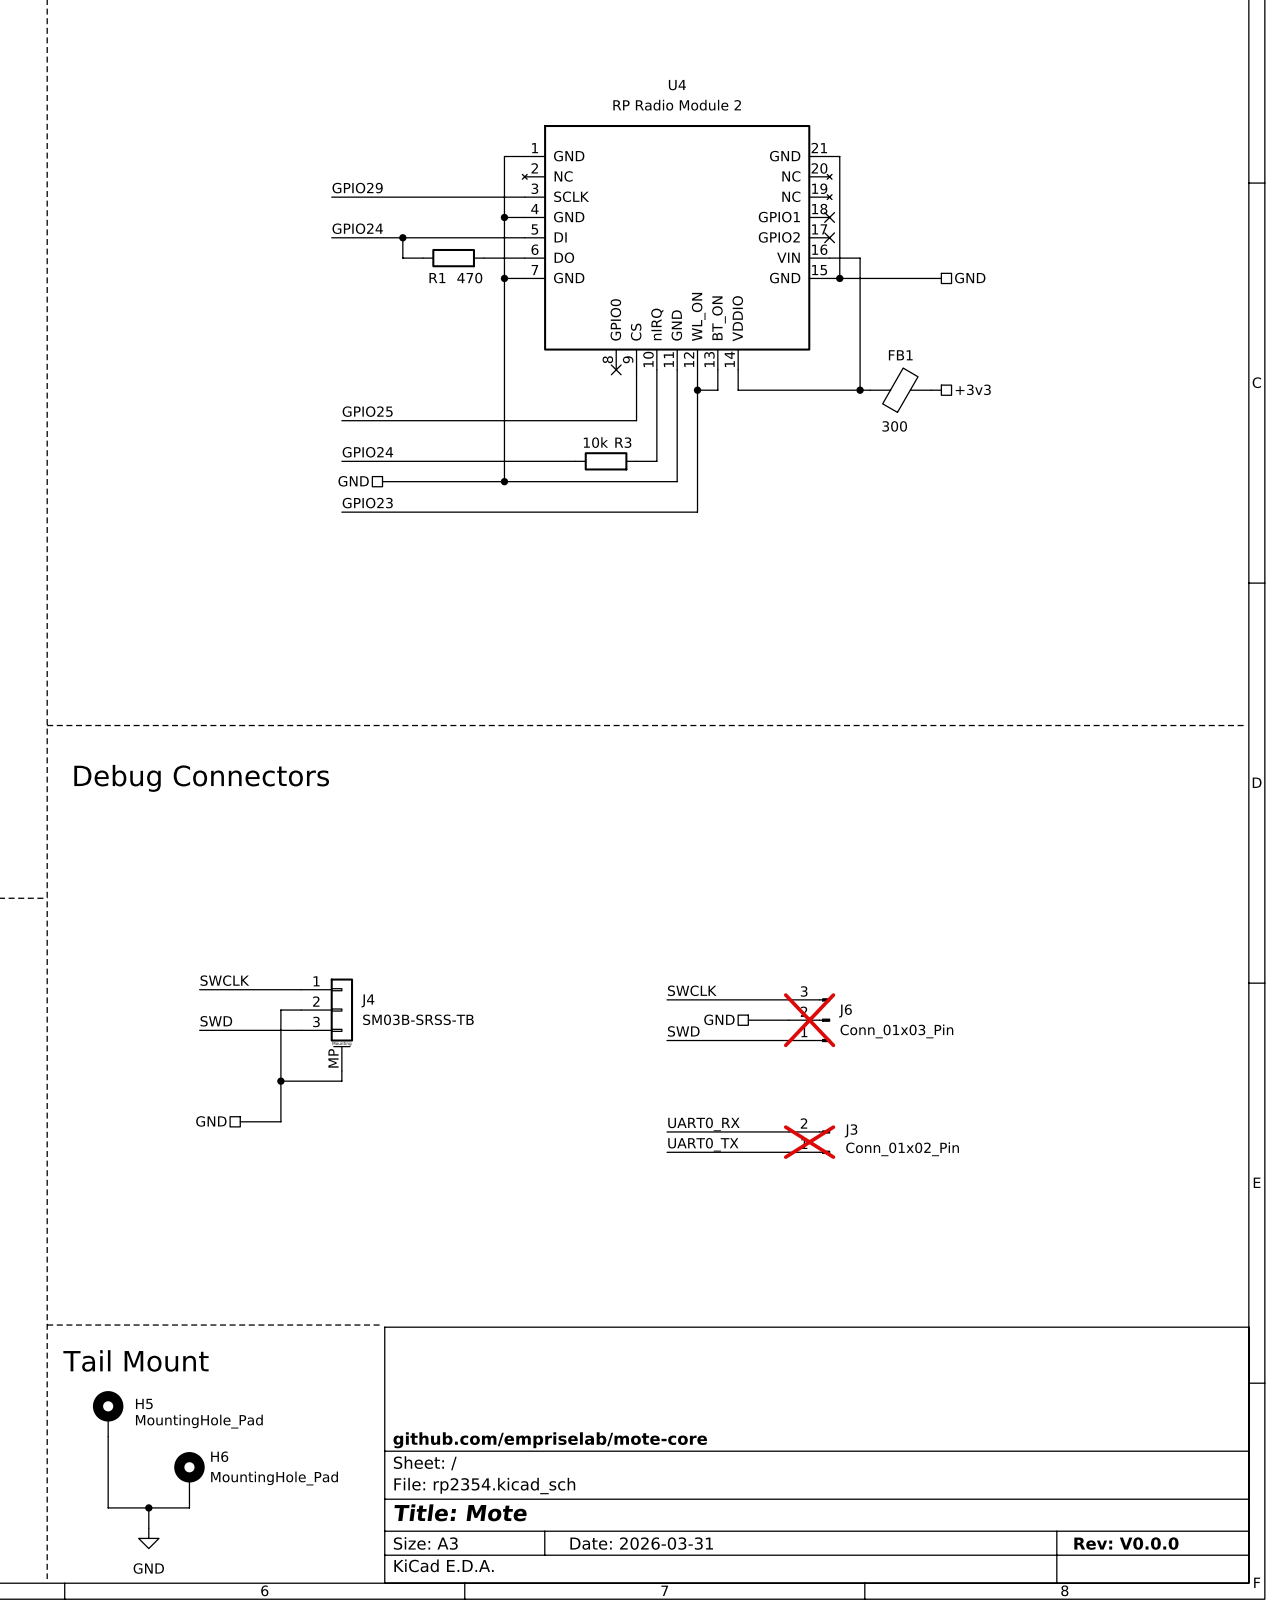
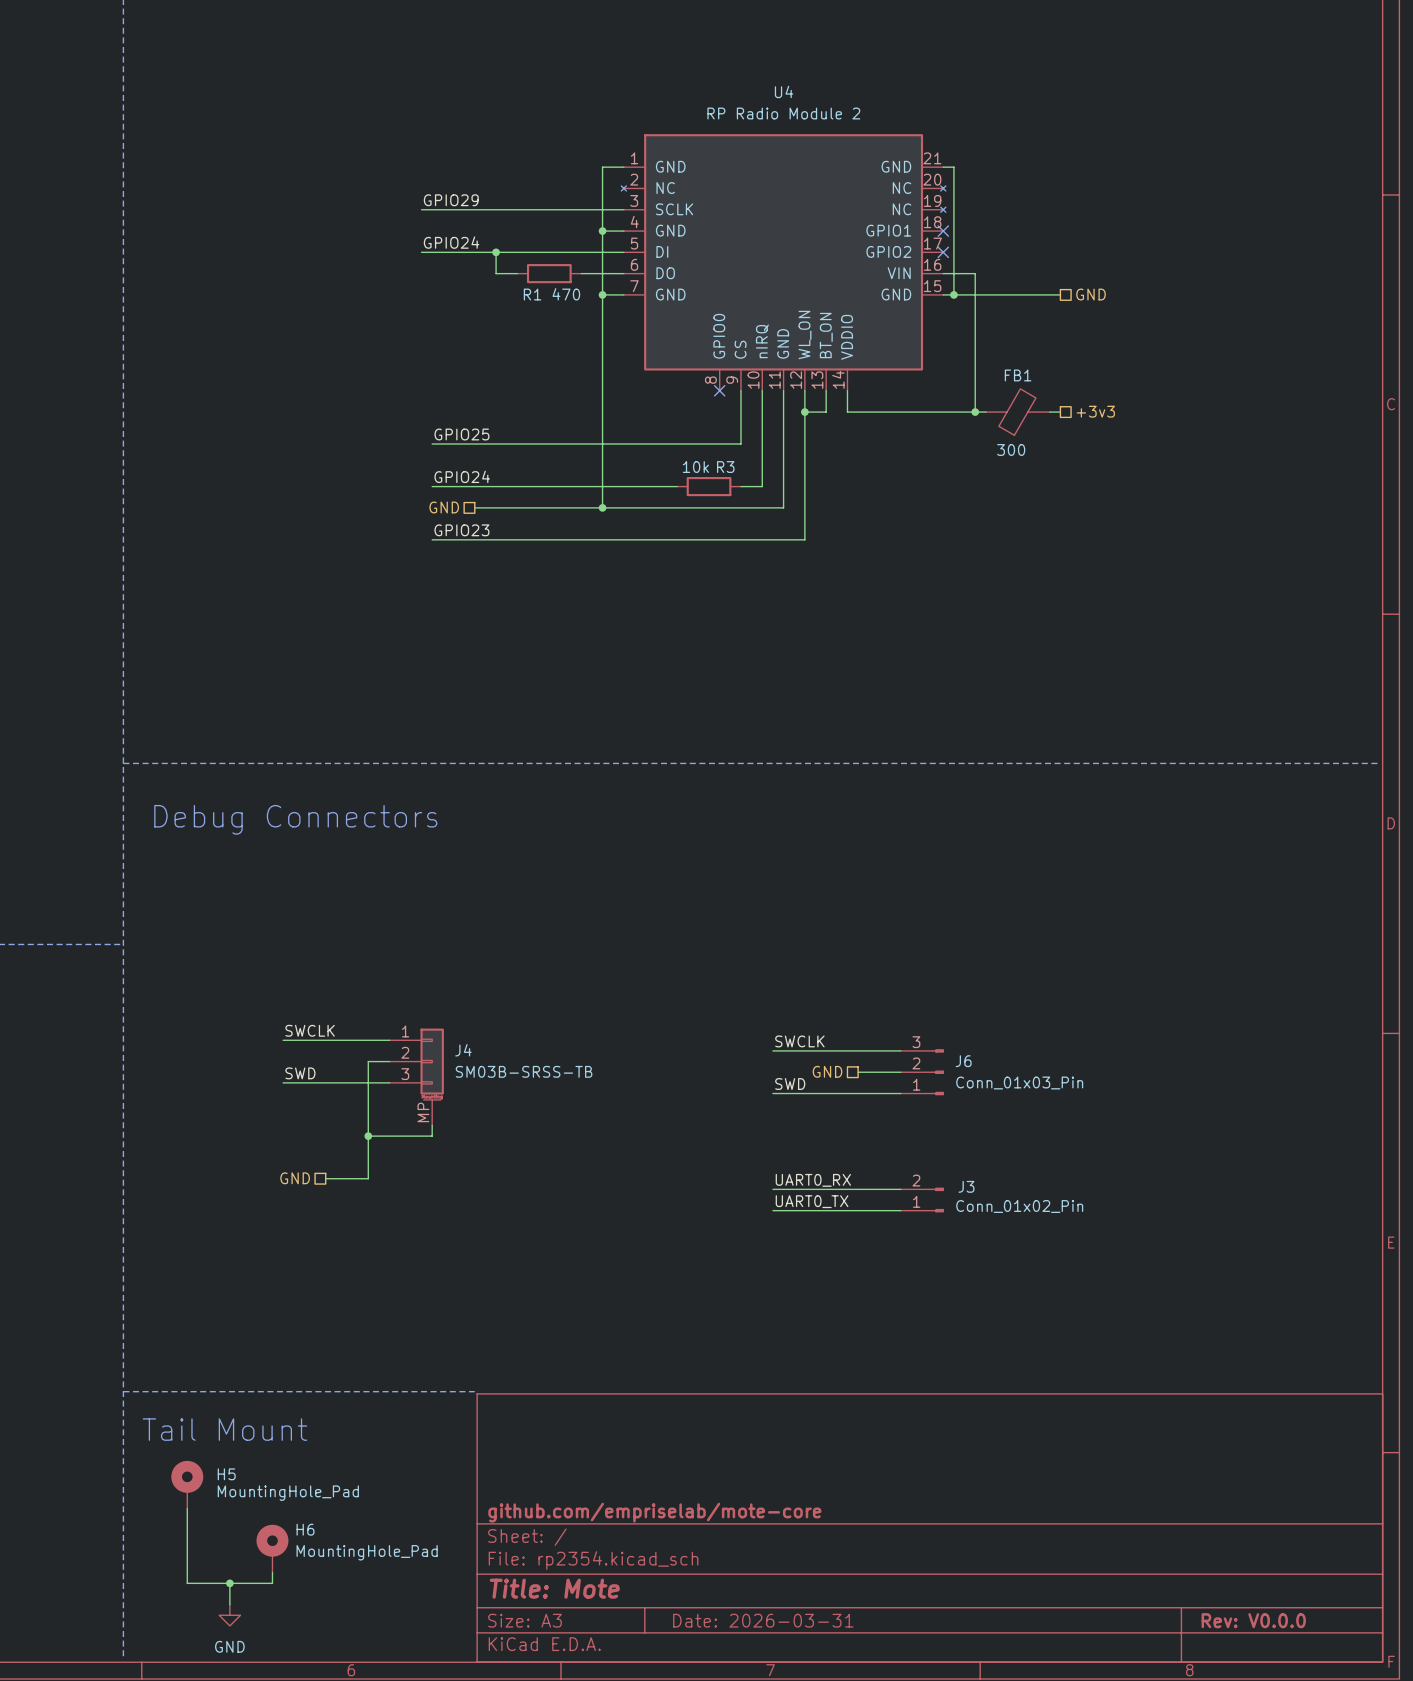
J6 do-not-place cross: (809, 1020) -> none
J3 do-not-place cross: (809, 1142) -> none

